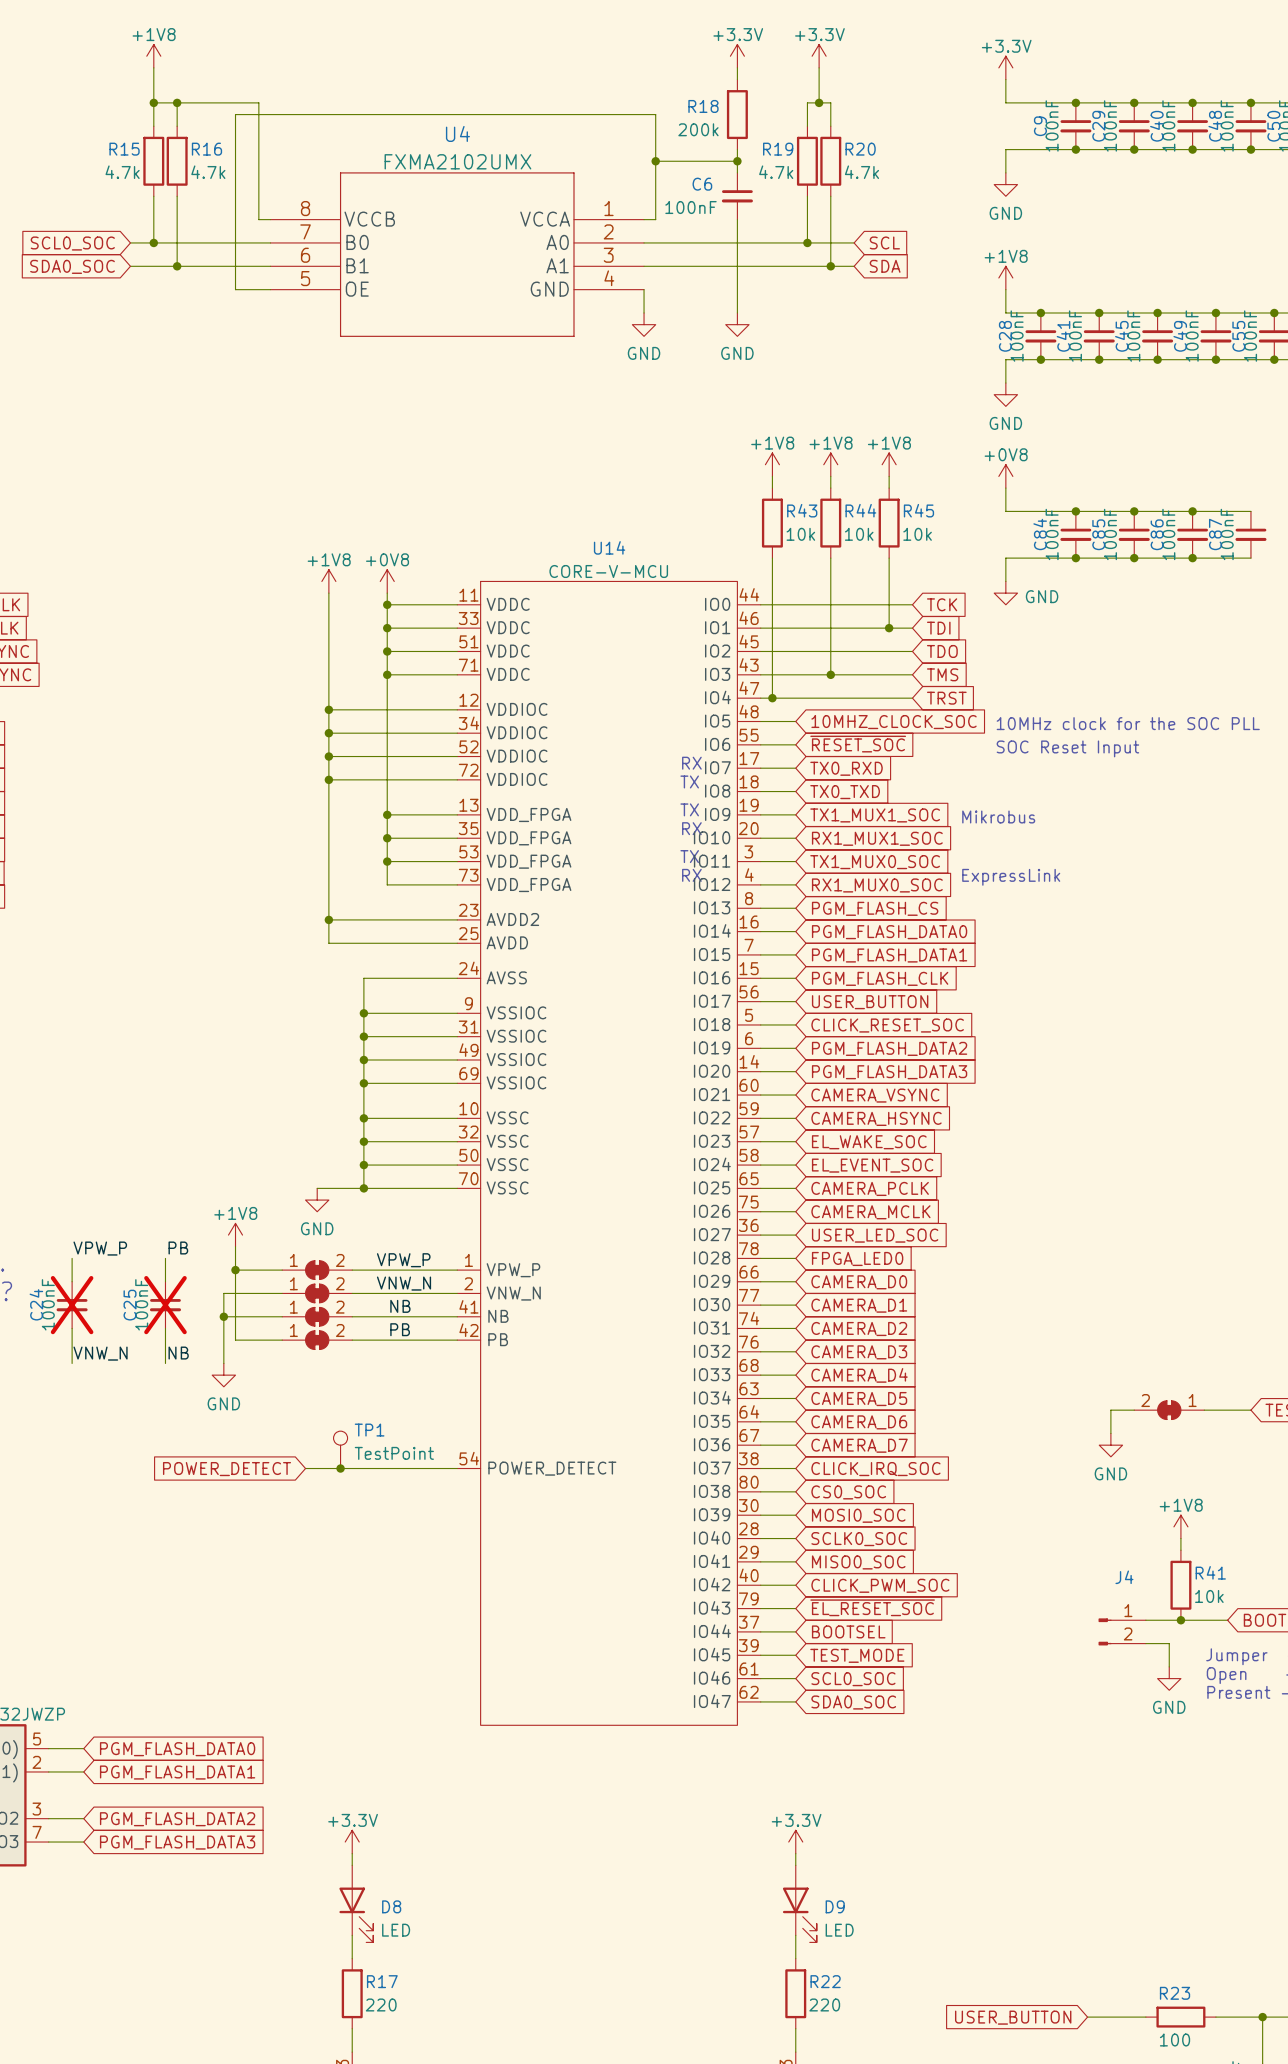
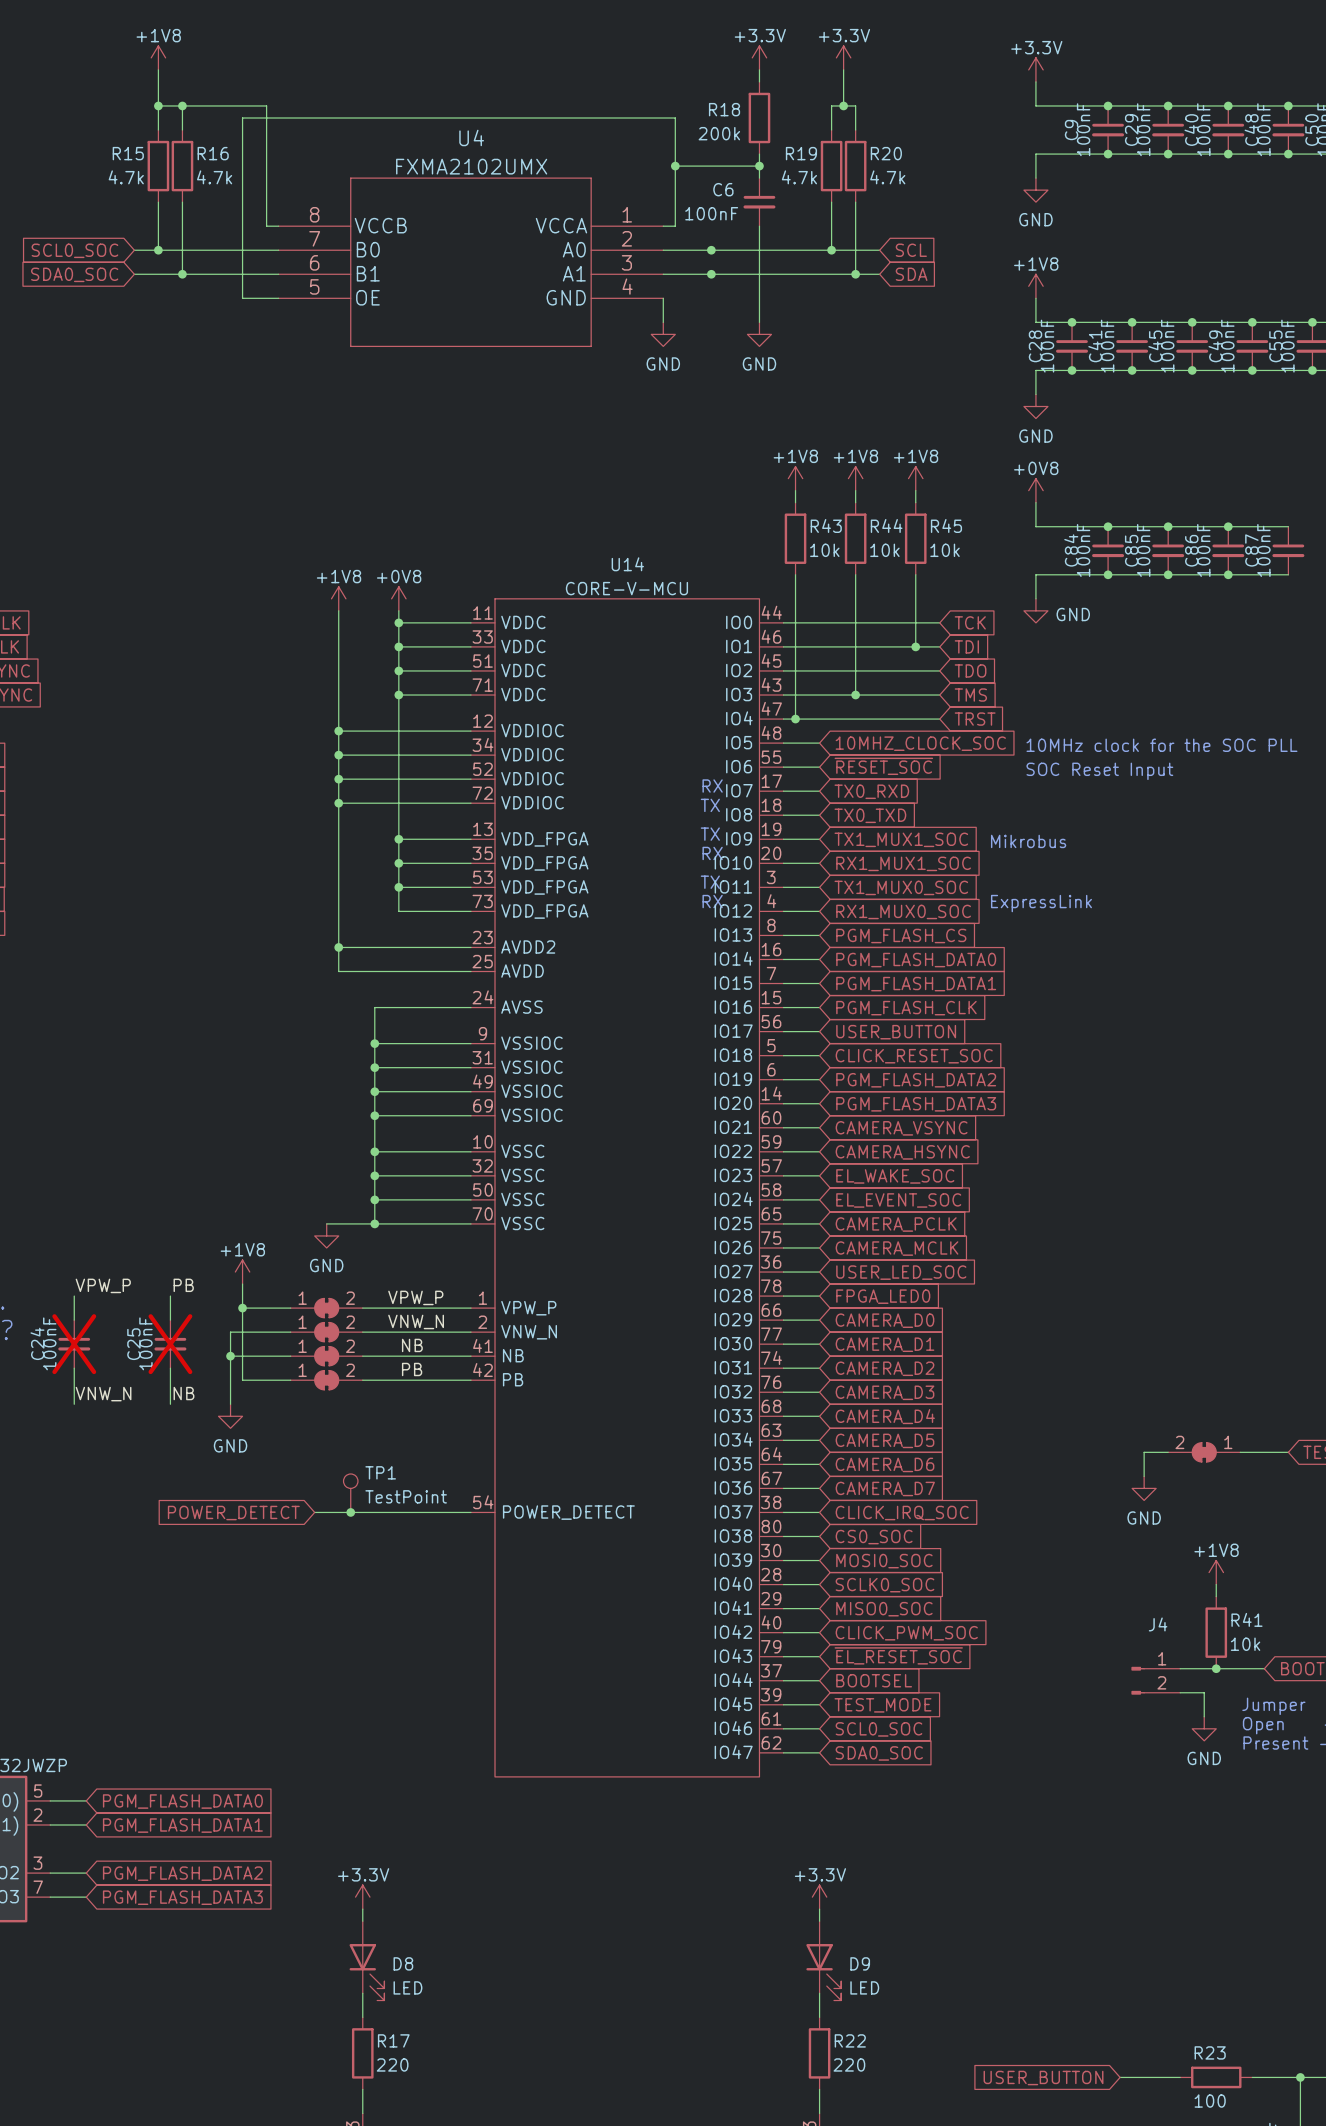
junction: none -> (711, 250)
junction: none -> (711, 274)

